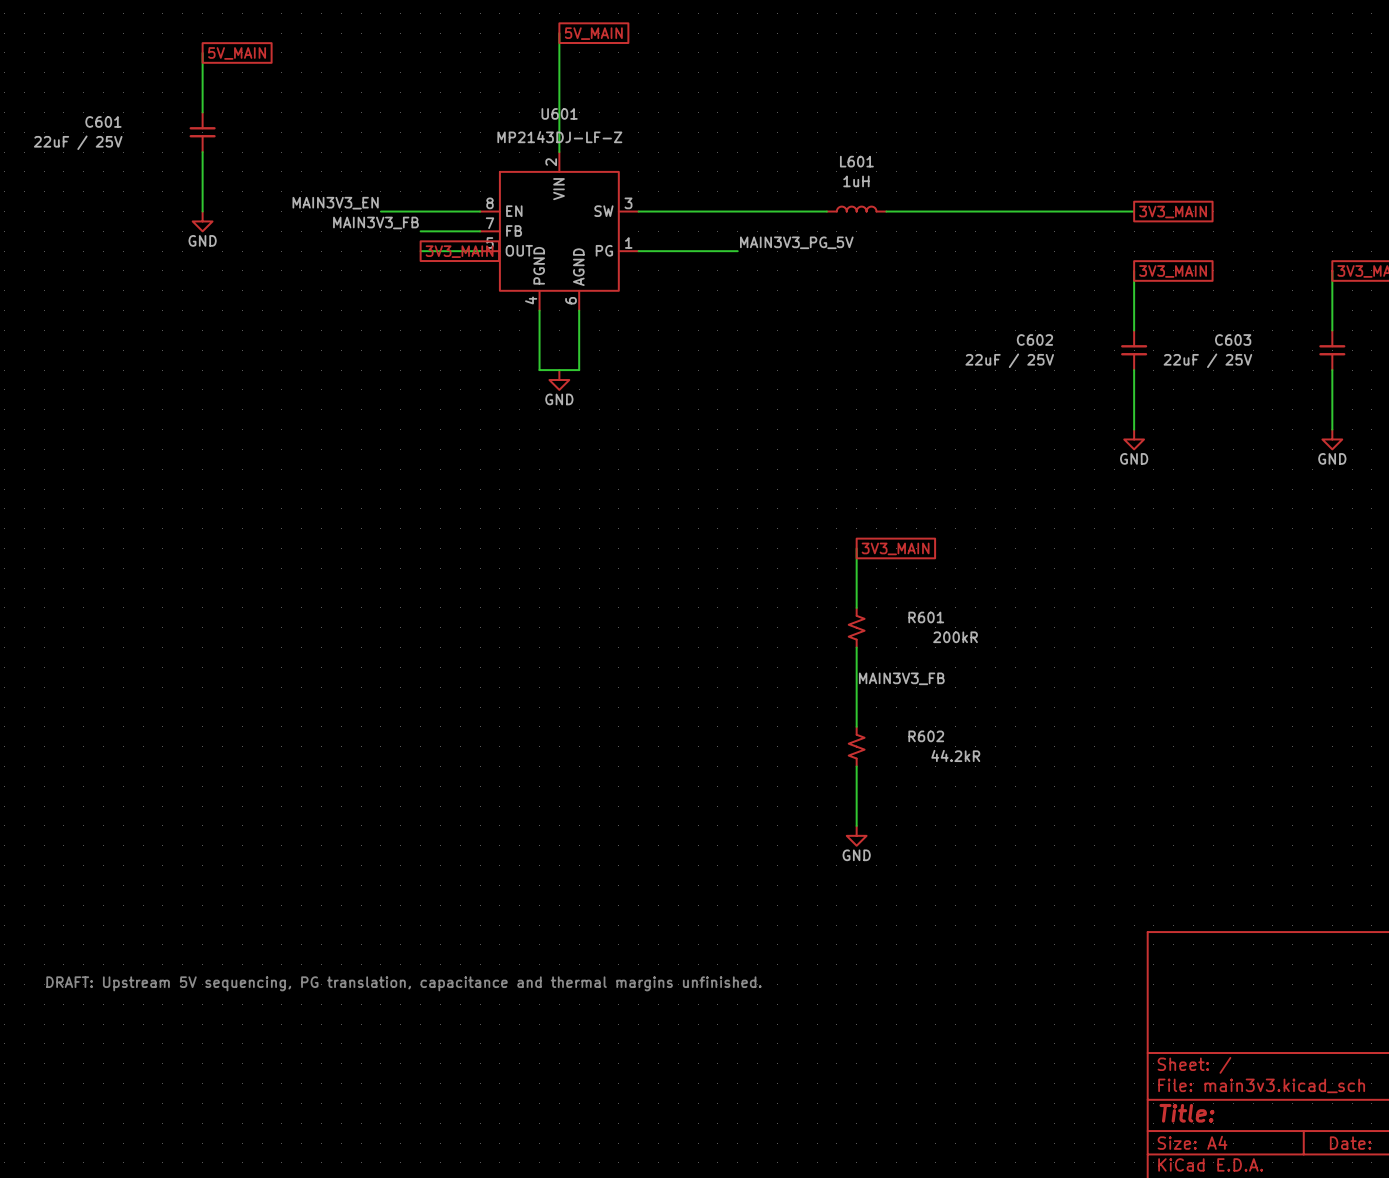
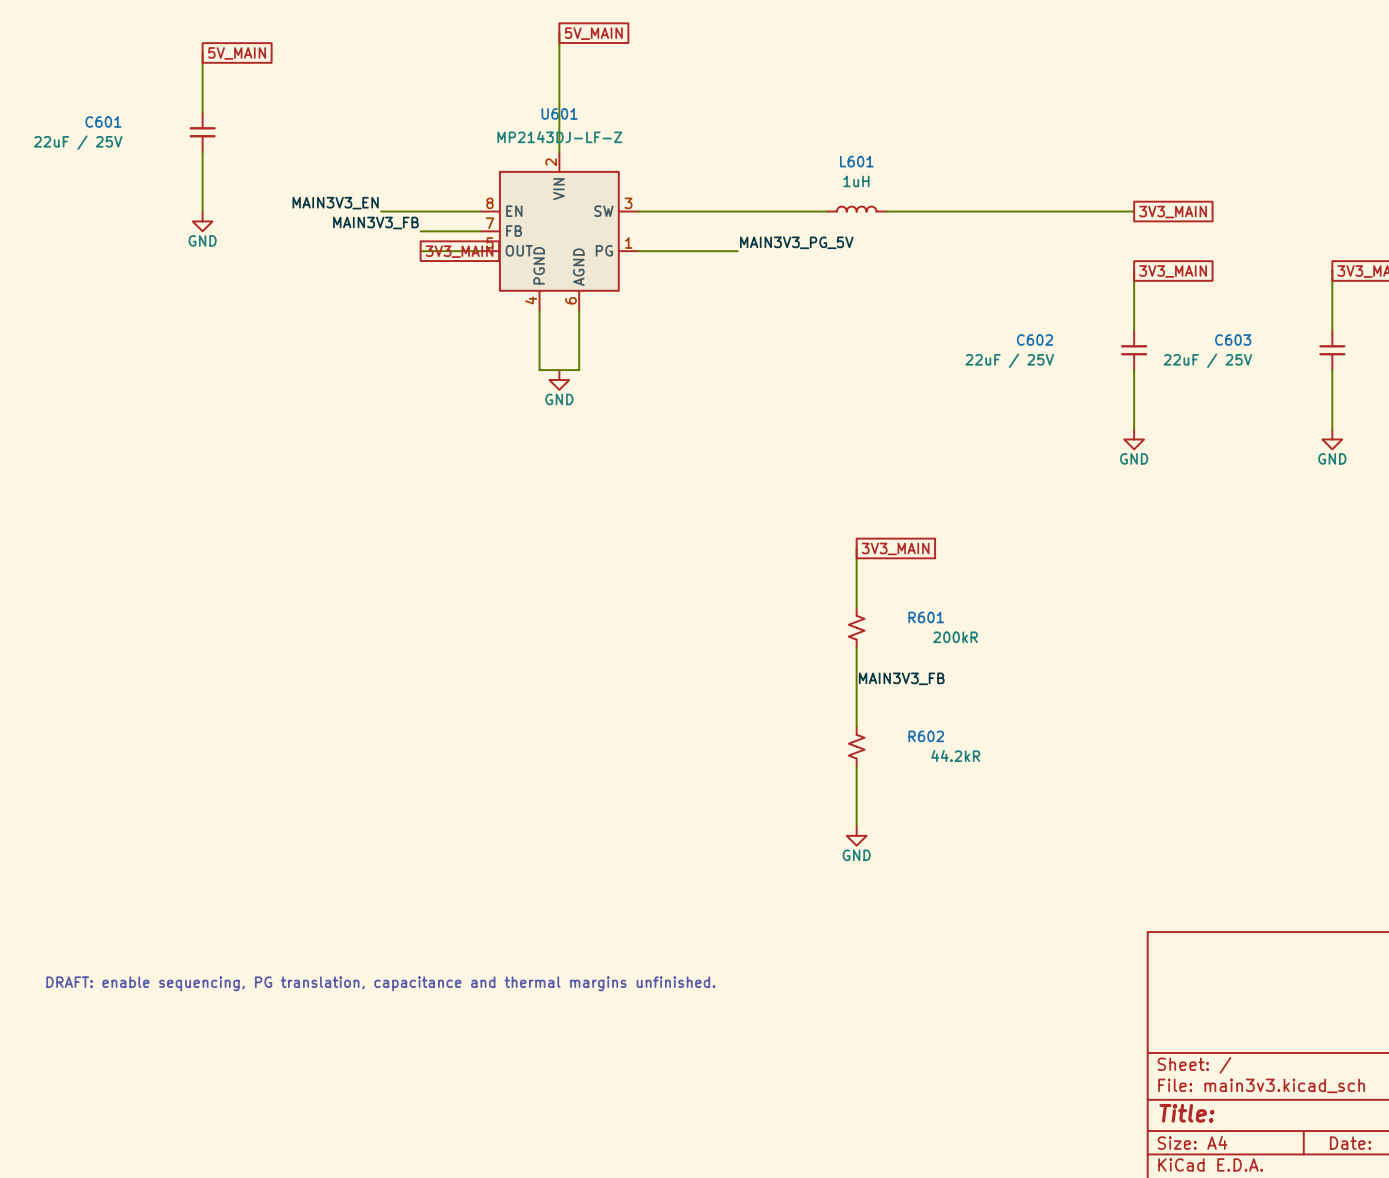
text: DRAFT: Upstream 5V sequencing, PG translation, capacitance and thermal margins unfinished. (403, 983) -> DRAFT: enable sequencing, PG translation, capacitance and thermal margins unfinished. (380, 983)

